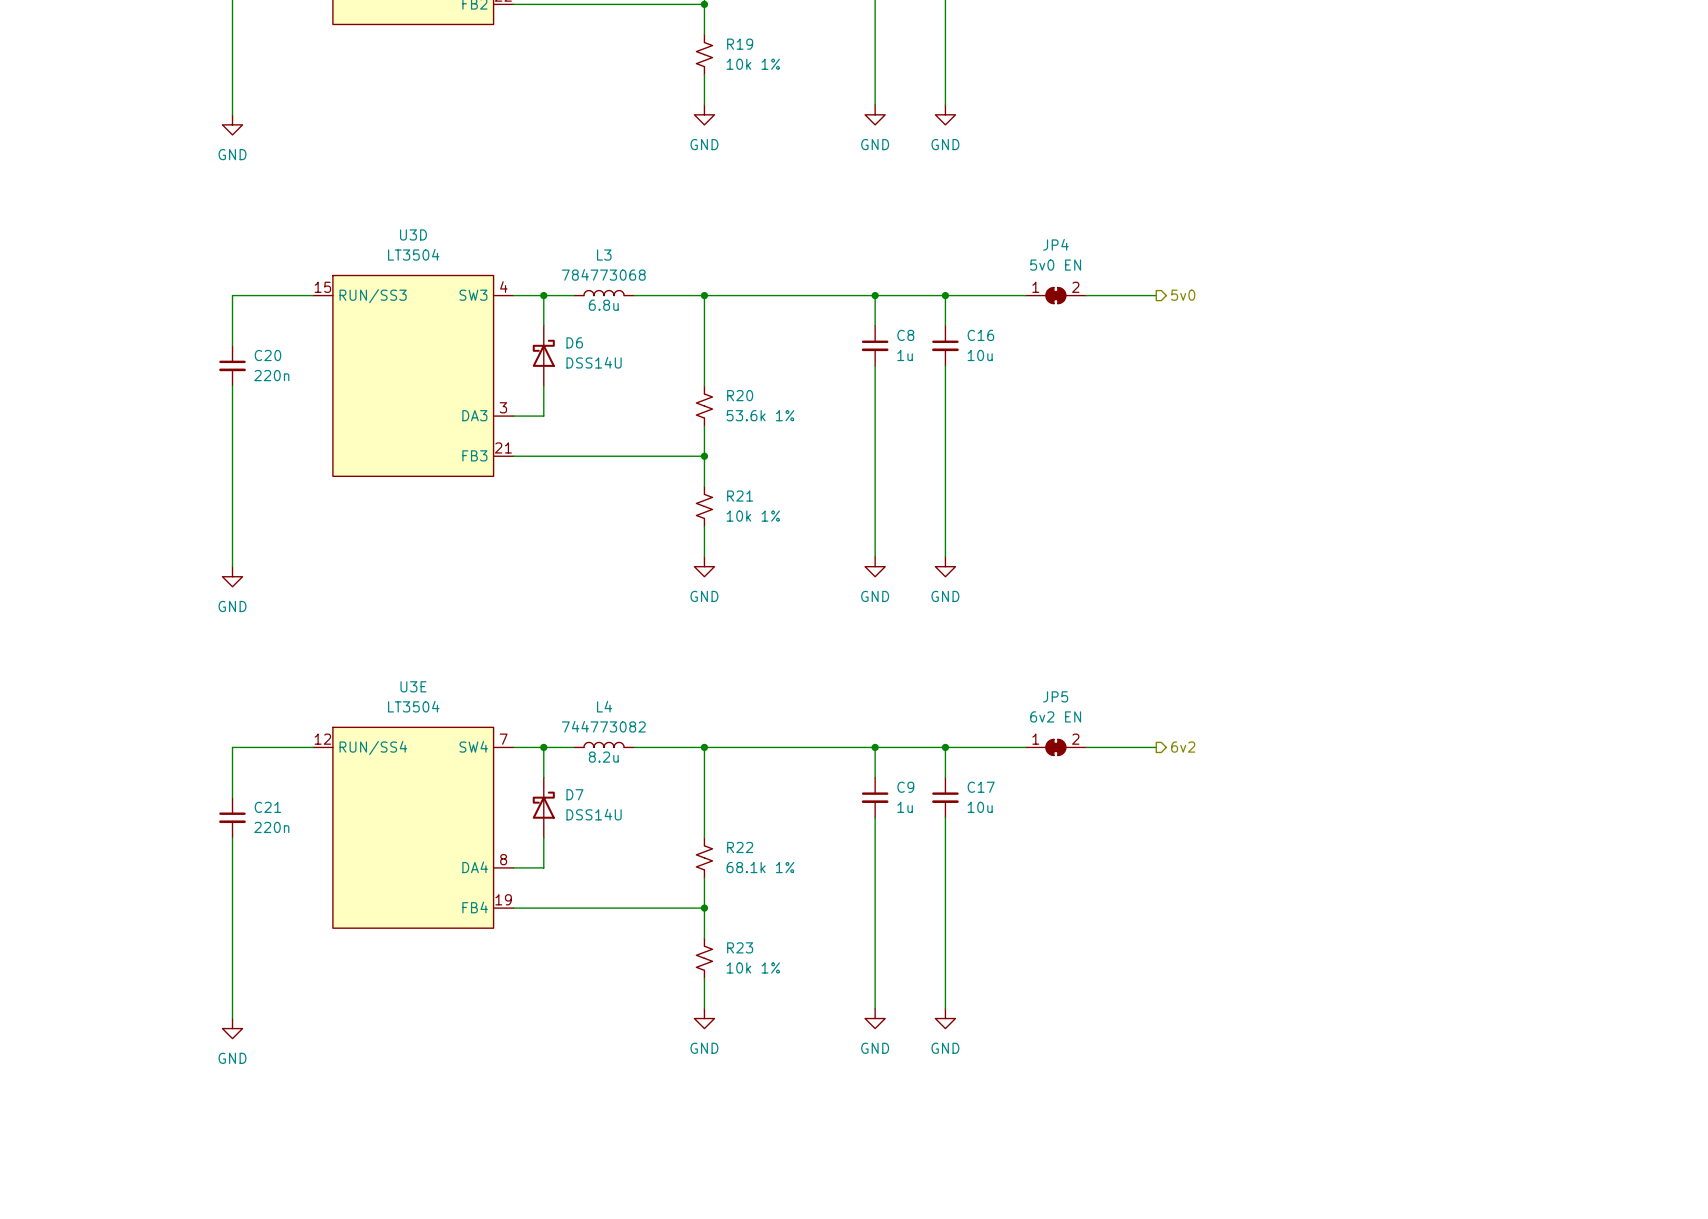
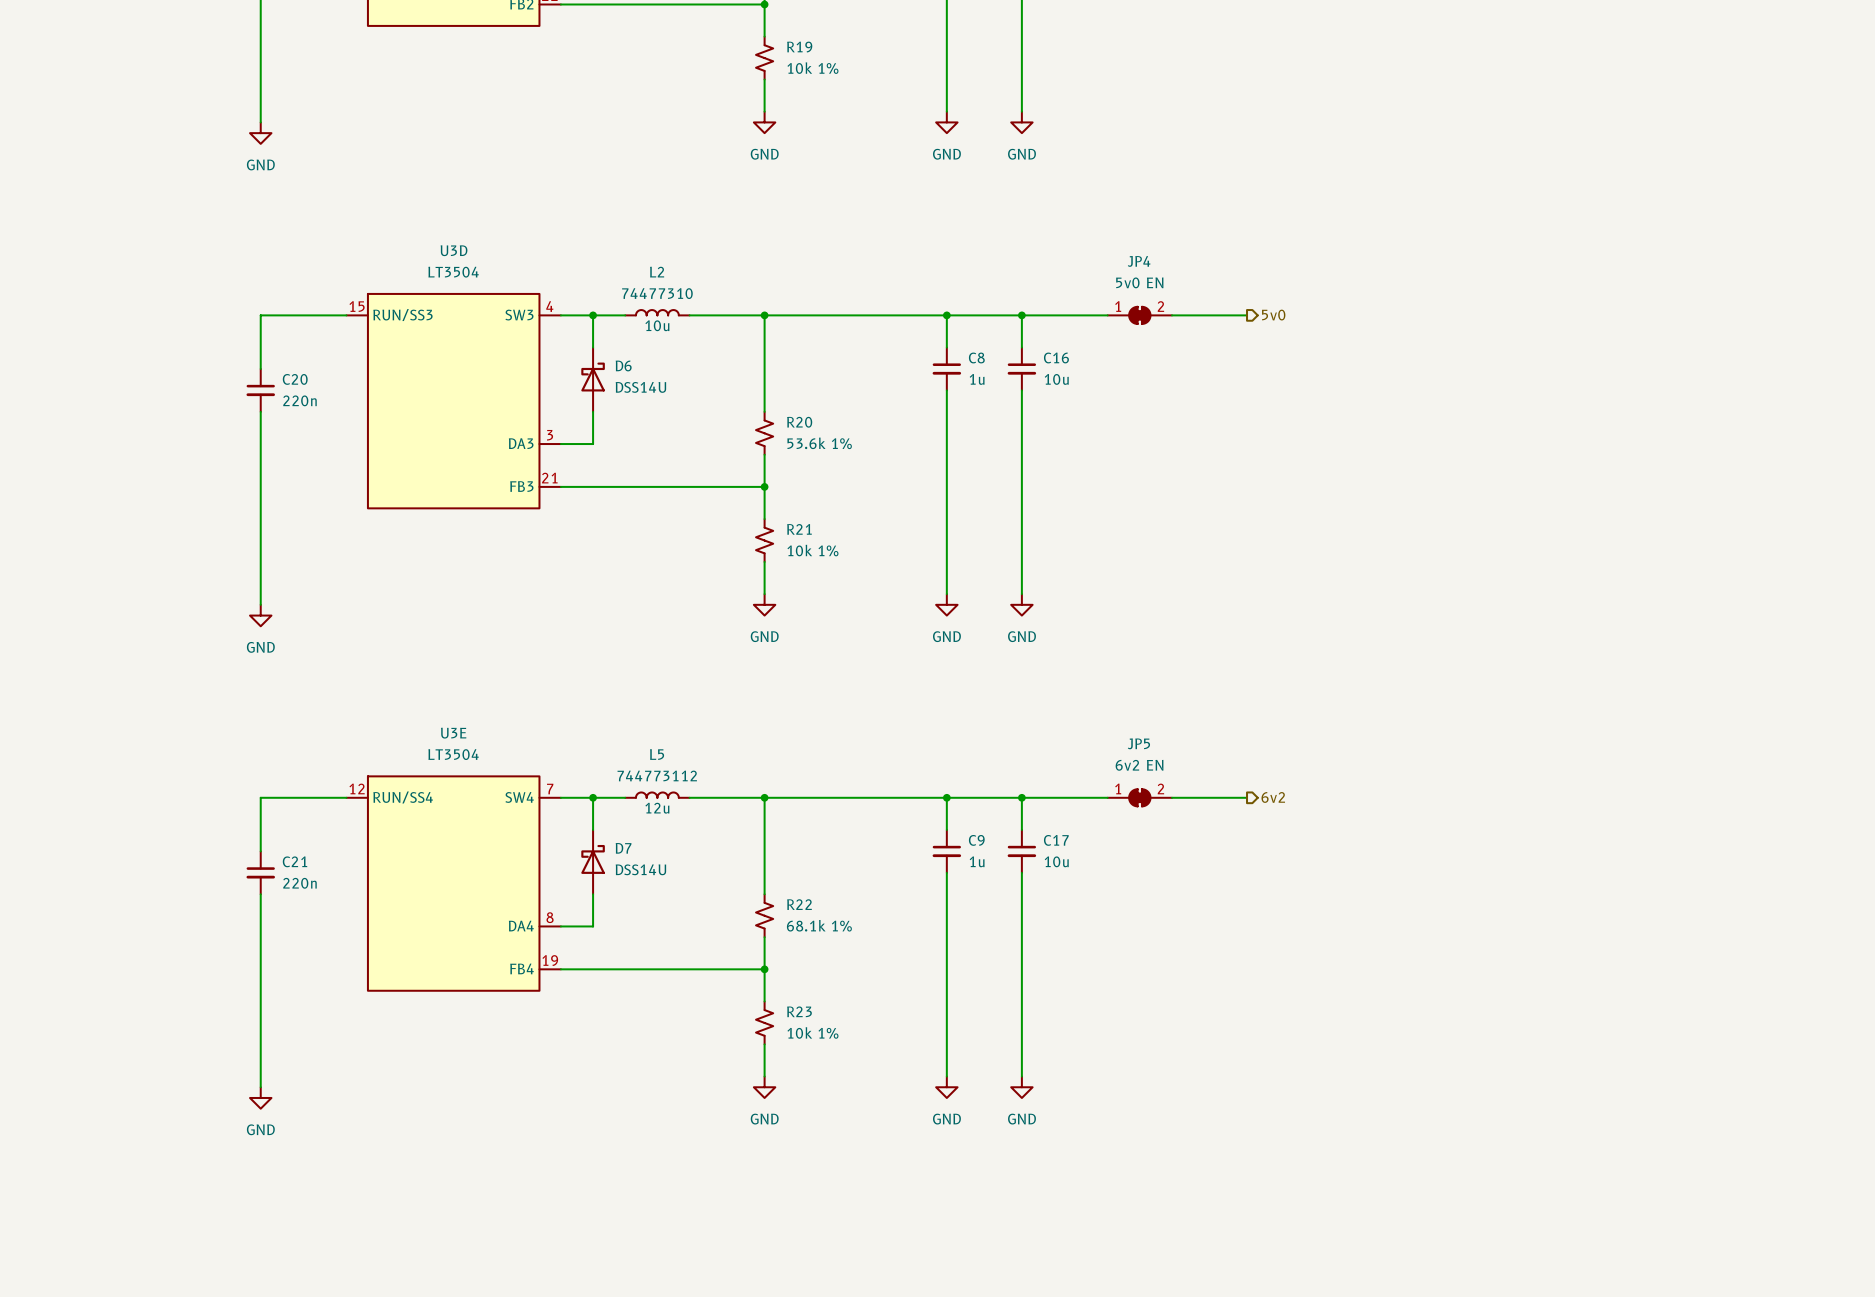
L3 name: L3 (604, 255) -> L2 (657, 272)
L3 value: 784773068 (603, 274) -> 74477310 (657, 293)
L3 text: 6.8u (603, 305) -> 10u (657, 325)
L4 name: L4 (604, 706) -> L5 (657, 754)
L4 value: 744773082 (603, 726) -> 744773112 (657, 775)
L4 text: 8.2u (603, 757) -> 12u (657, 808)

